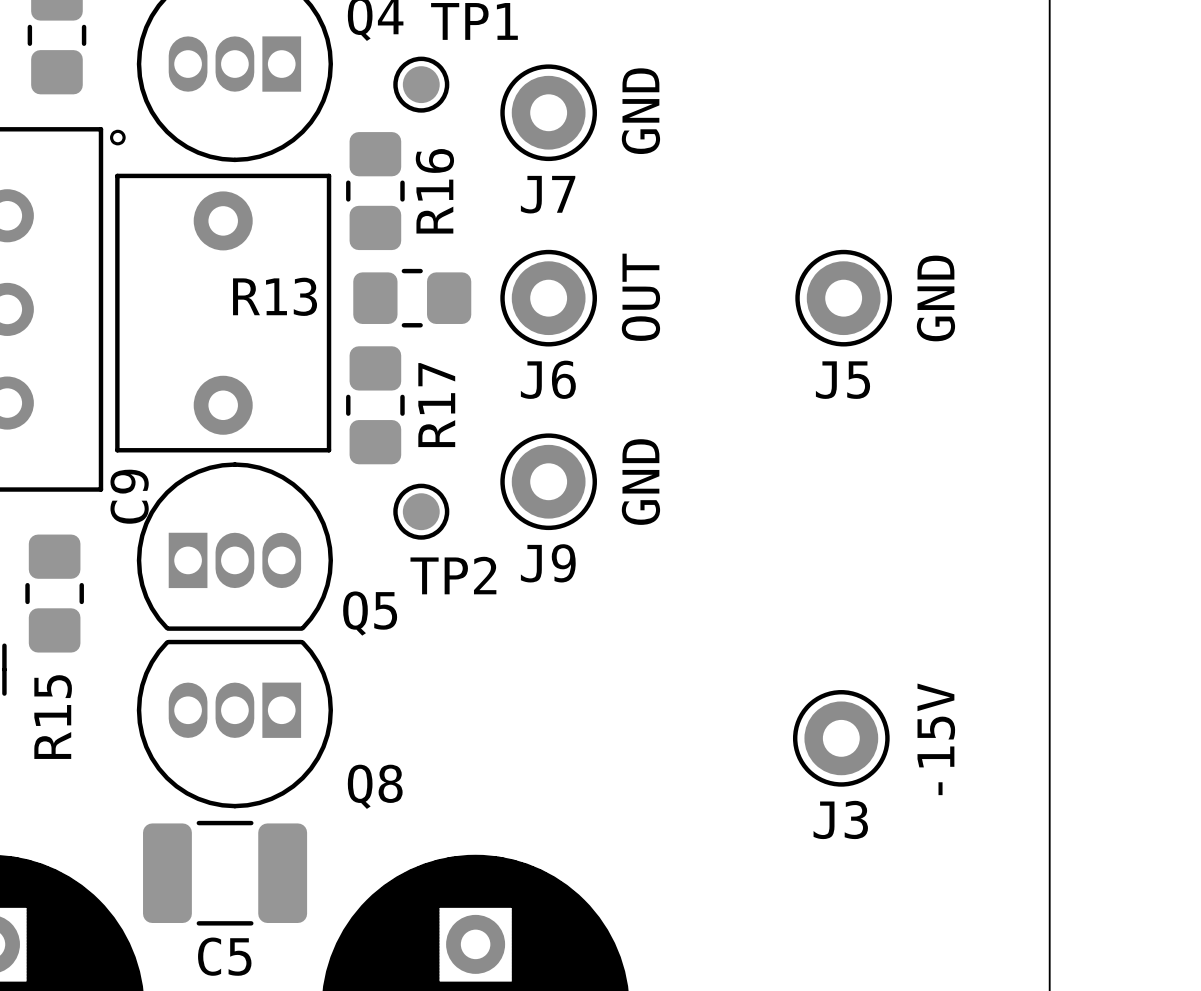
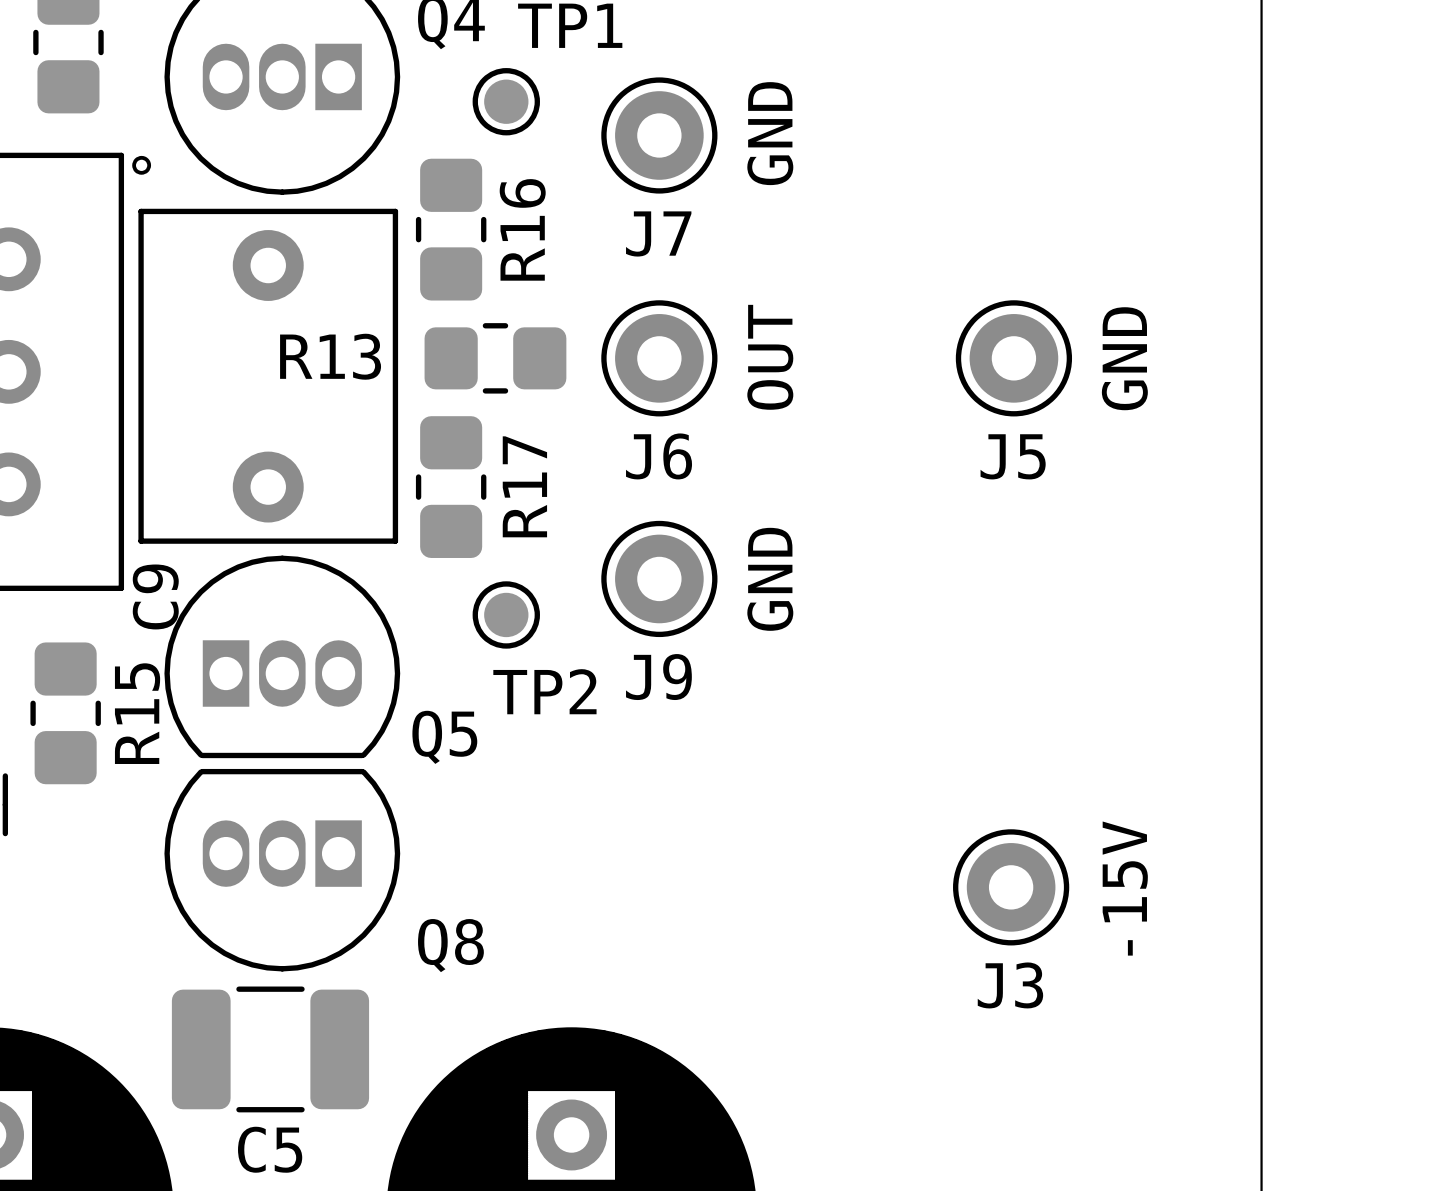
R15 name position: R15 (53, 717) -> R15 (137, 713)

